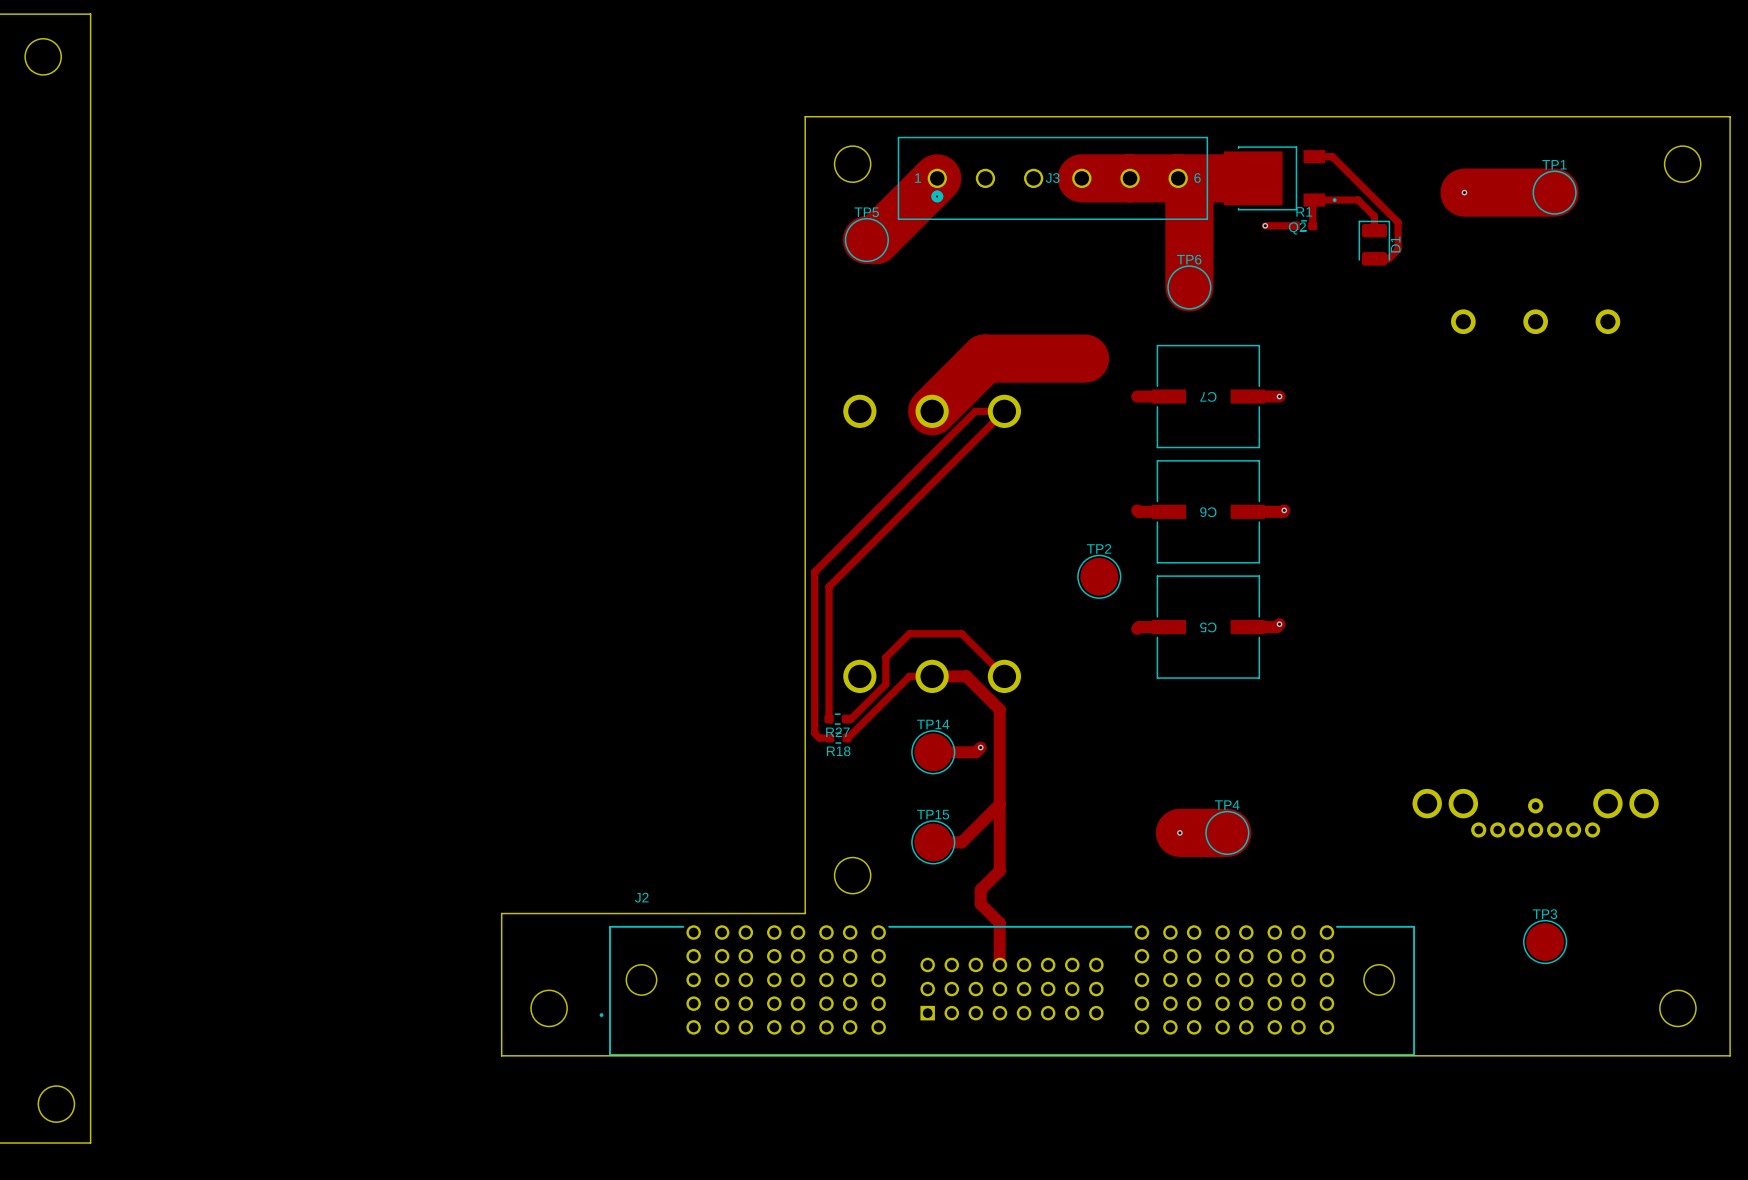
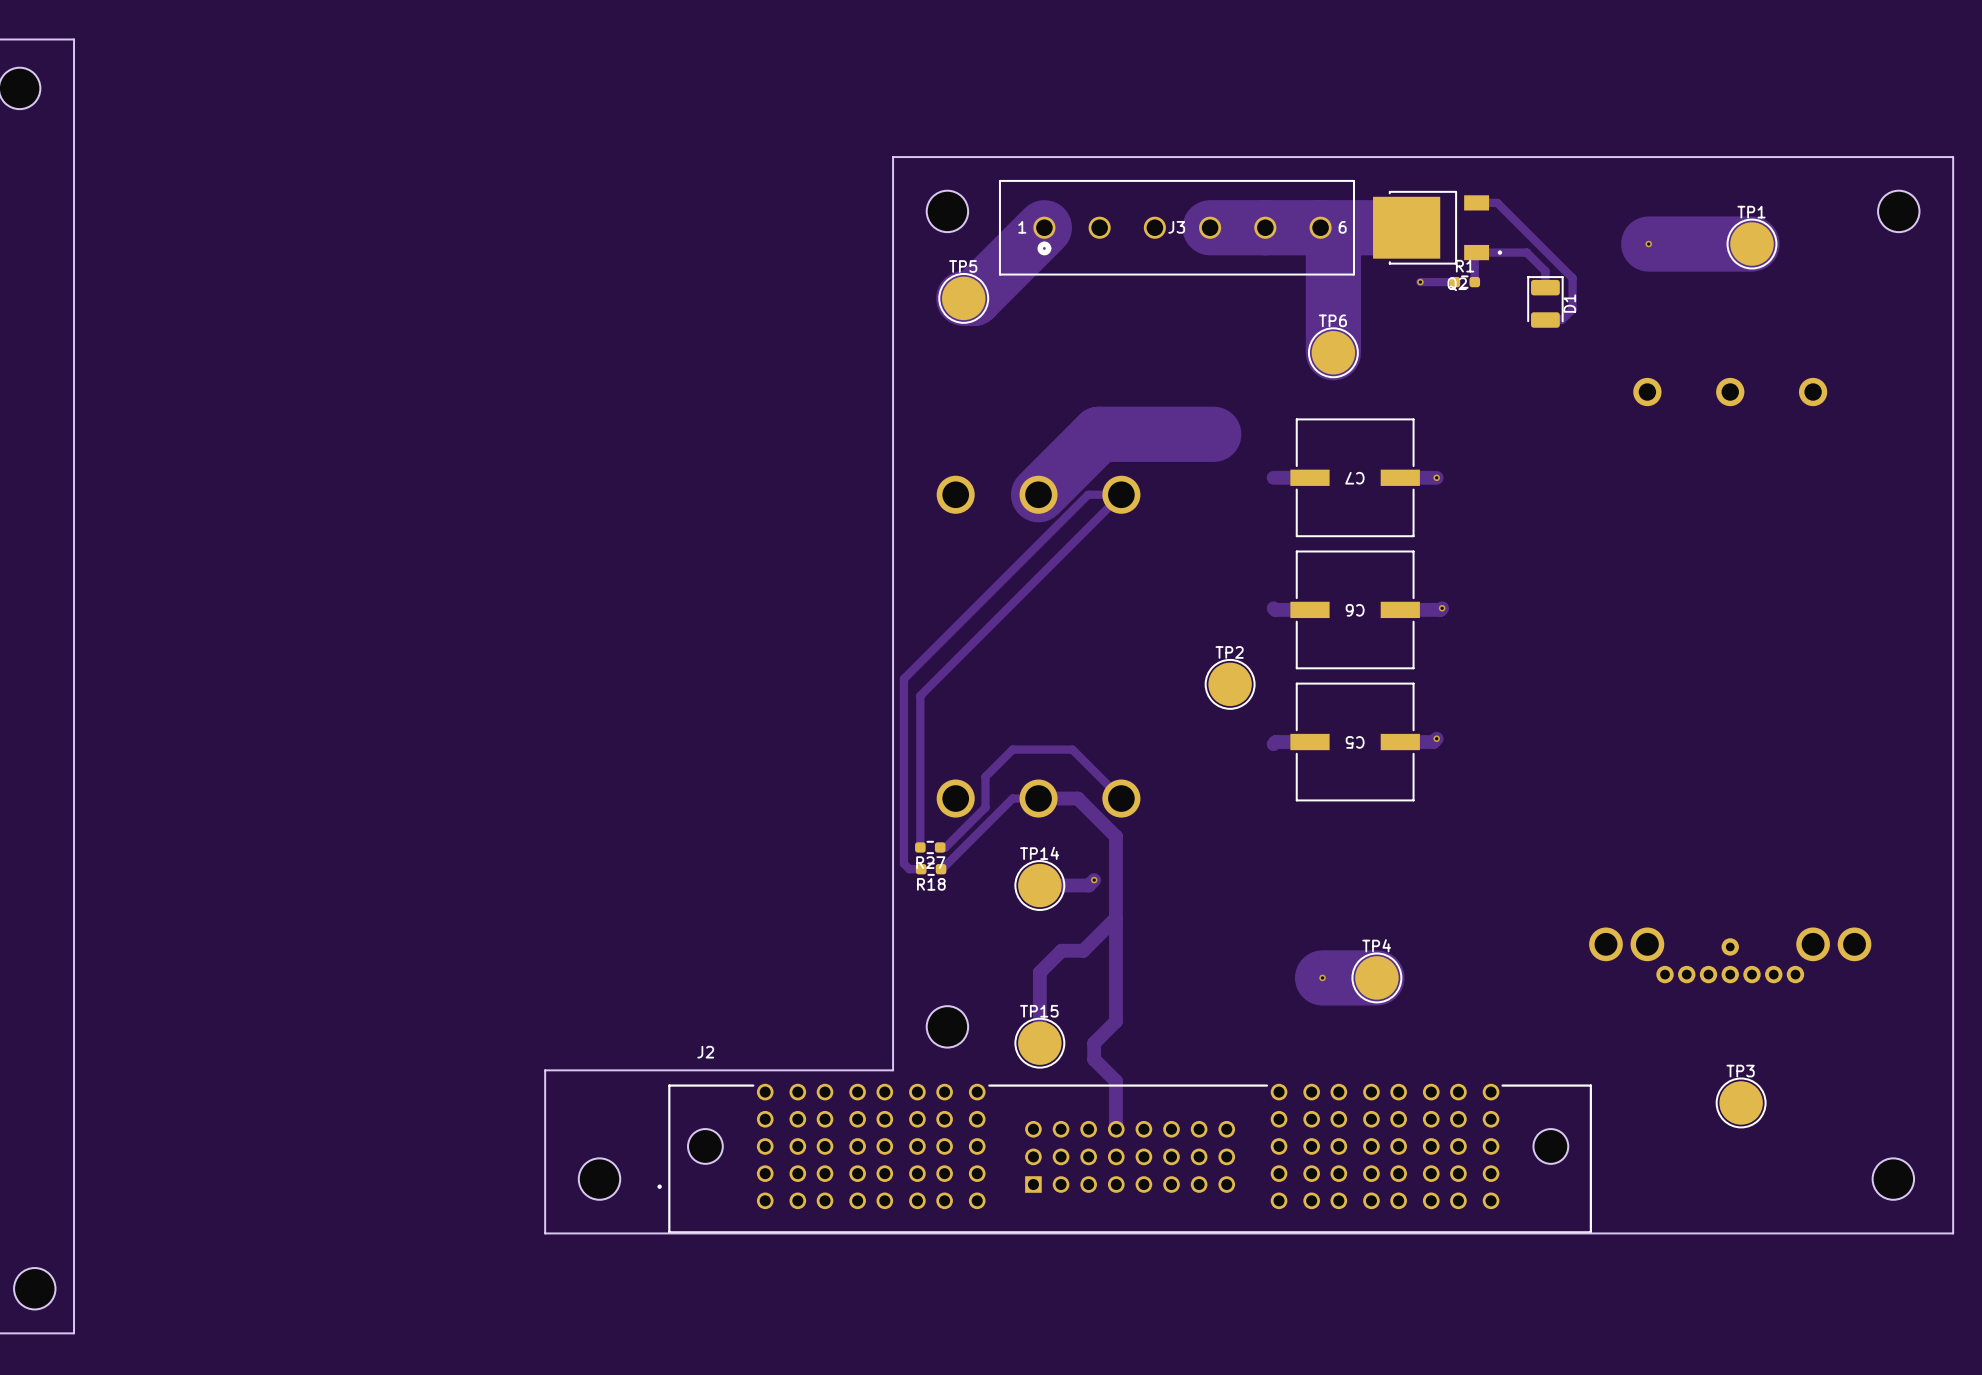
track: none -> (1115, 918) (1083, 950) (1061, 950) (1039, 972) (1039, 1043)
track: (999, 804) (961, 842) (933, 842) -> none
TP15 position: (933, 842) -> (1039, 1043)

